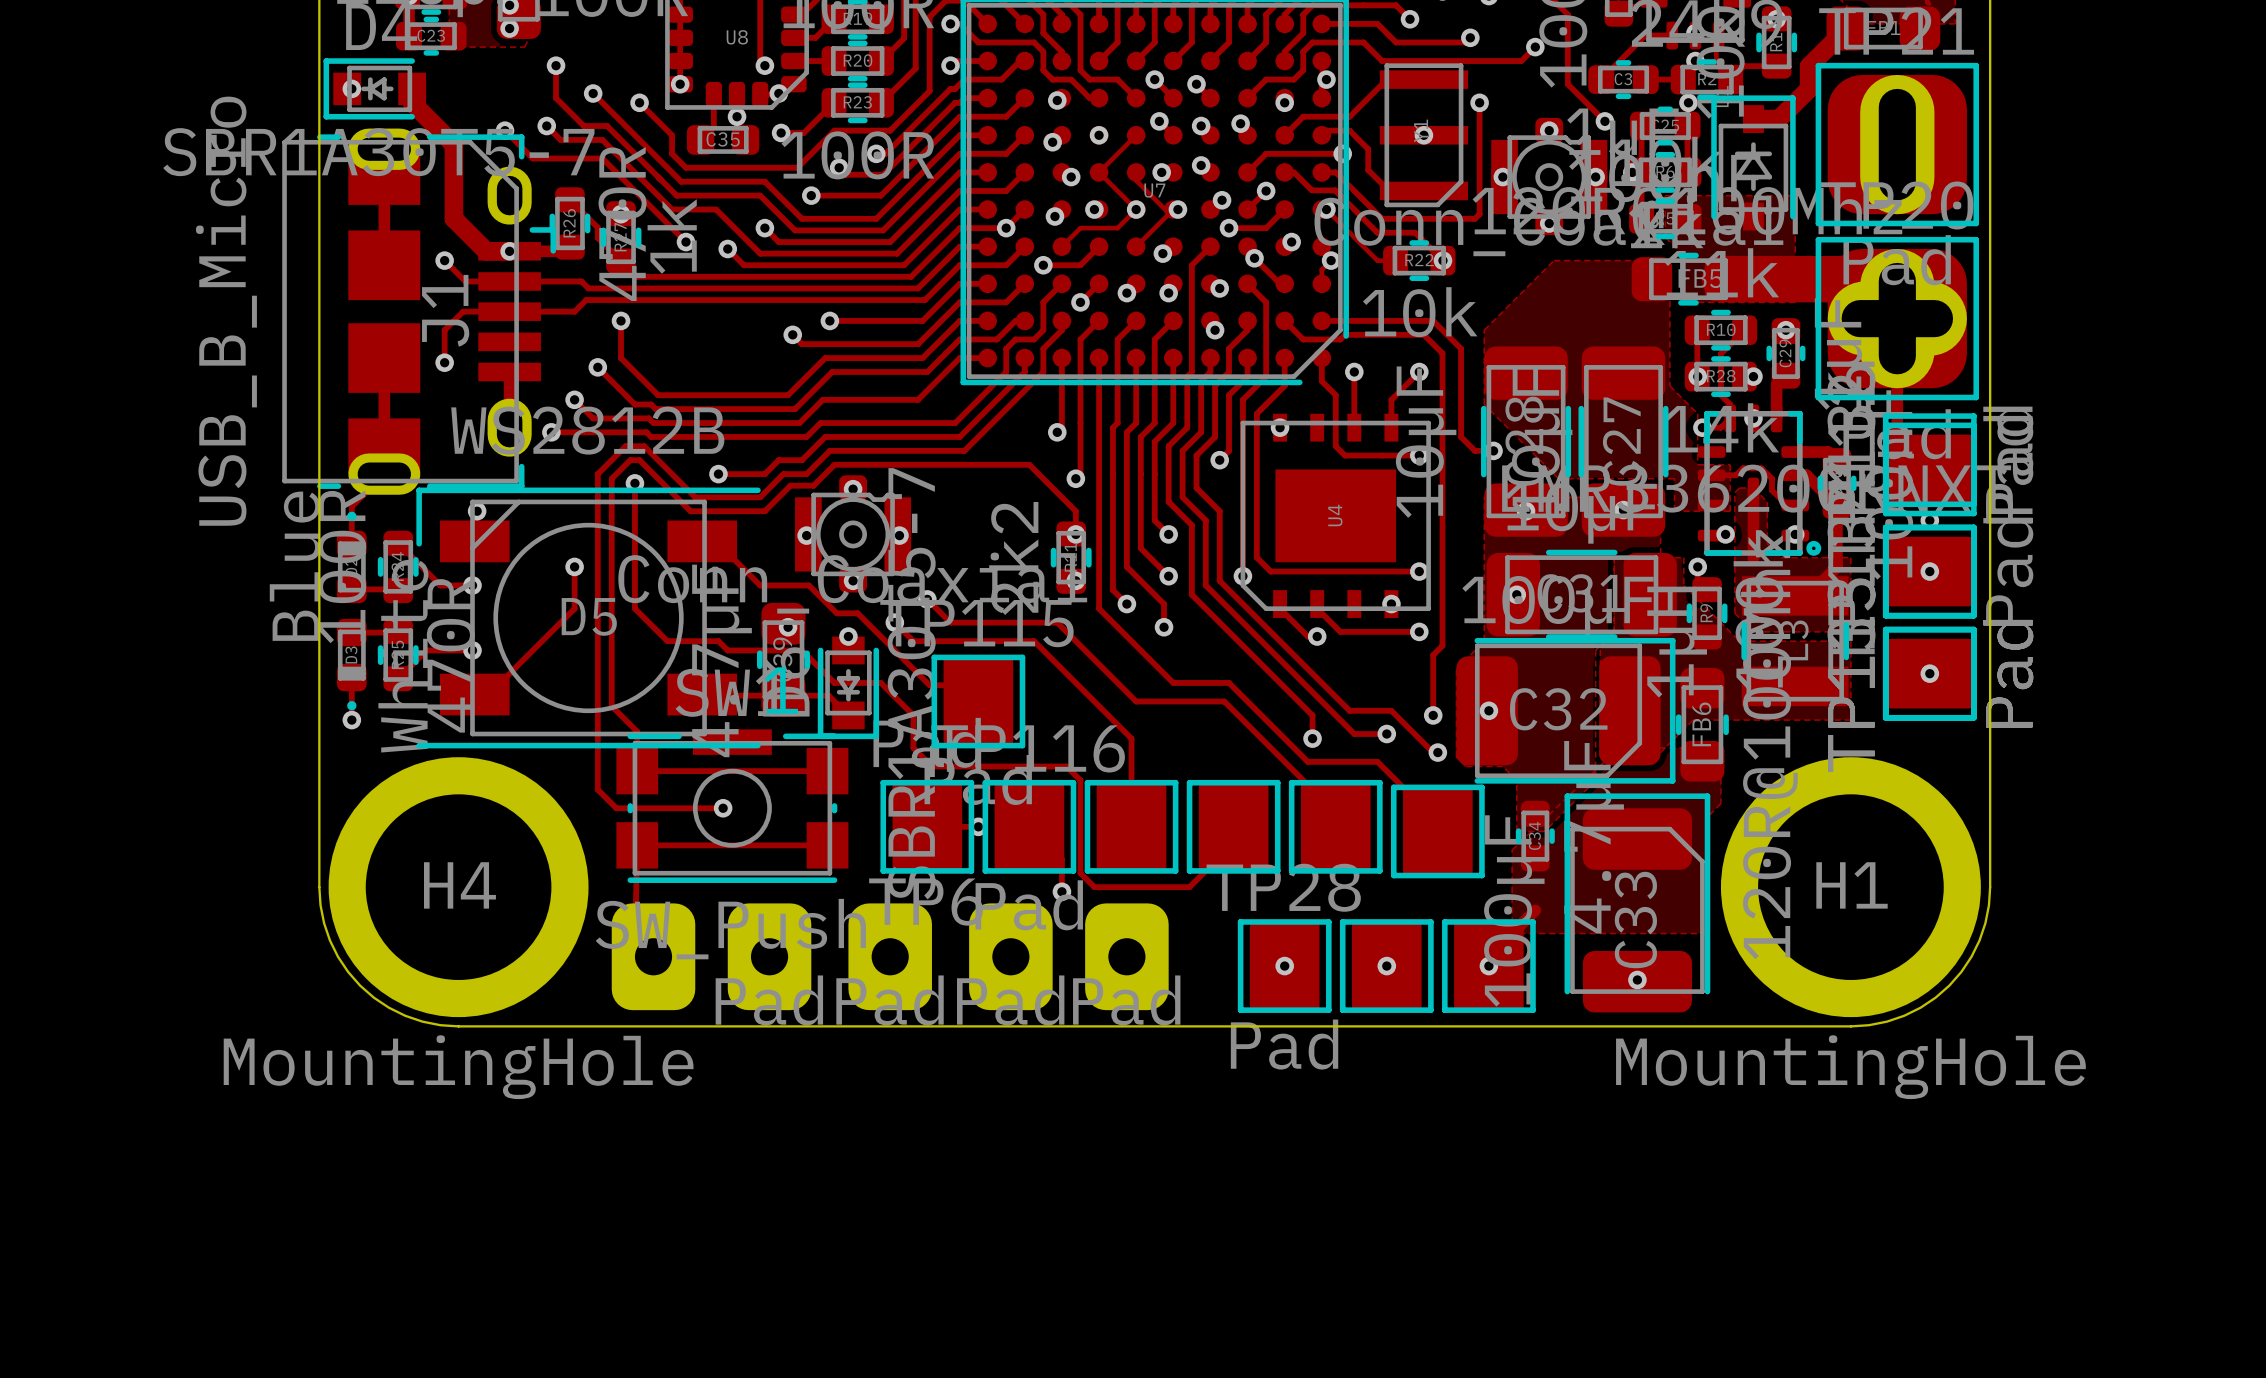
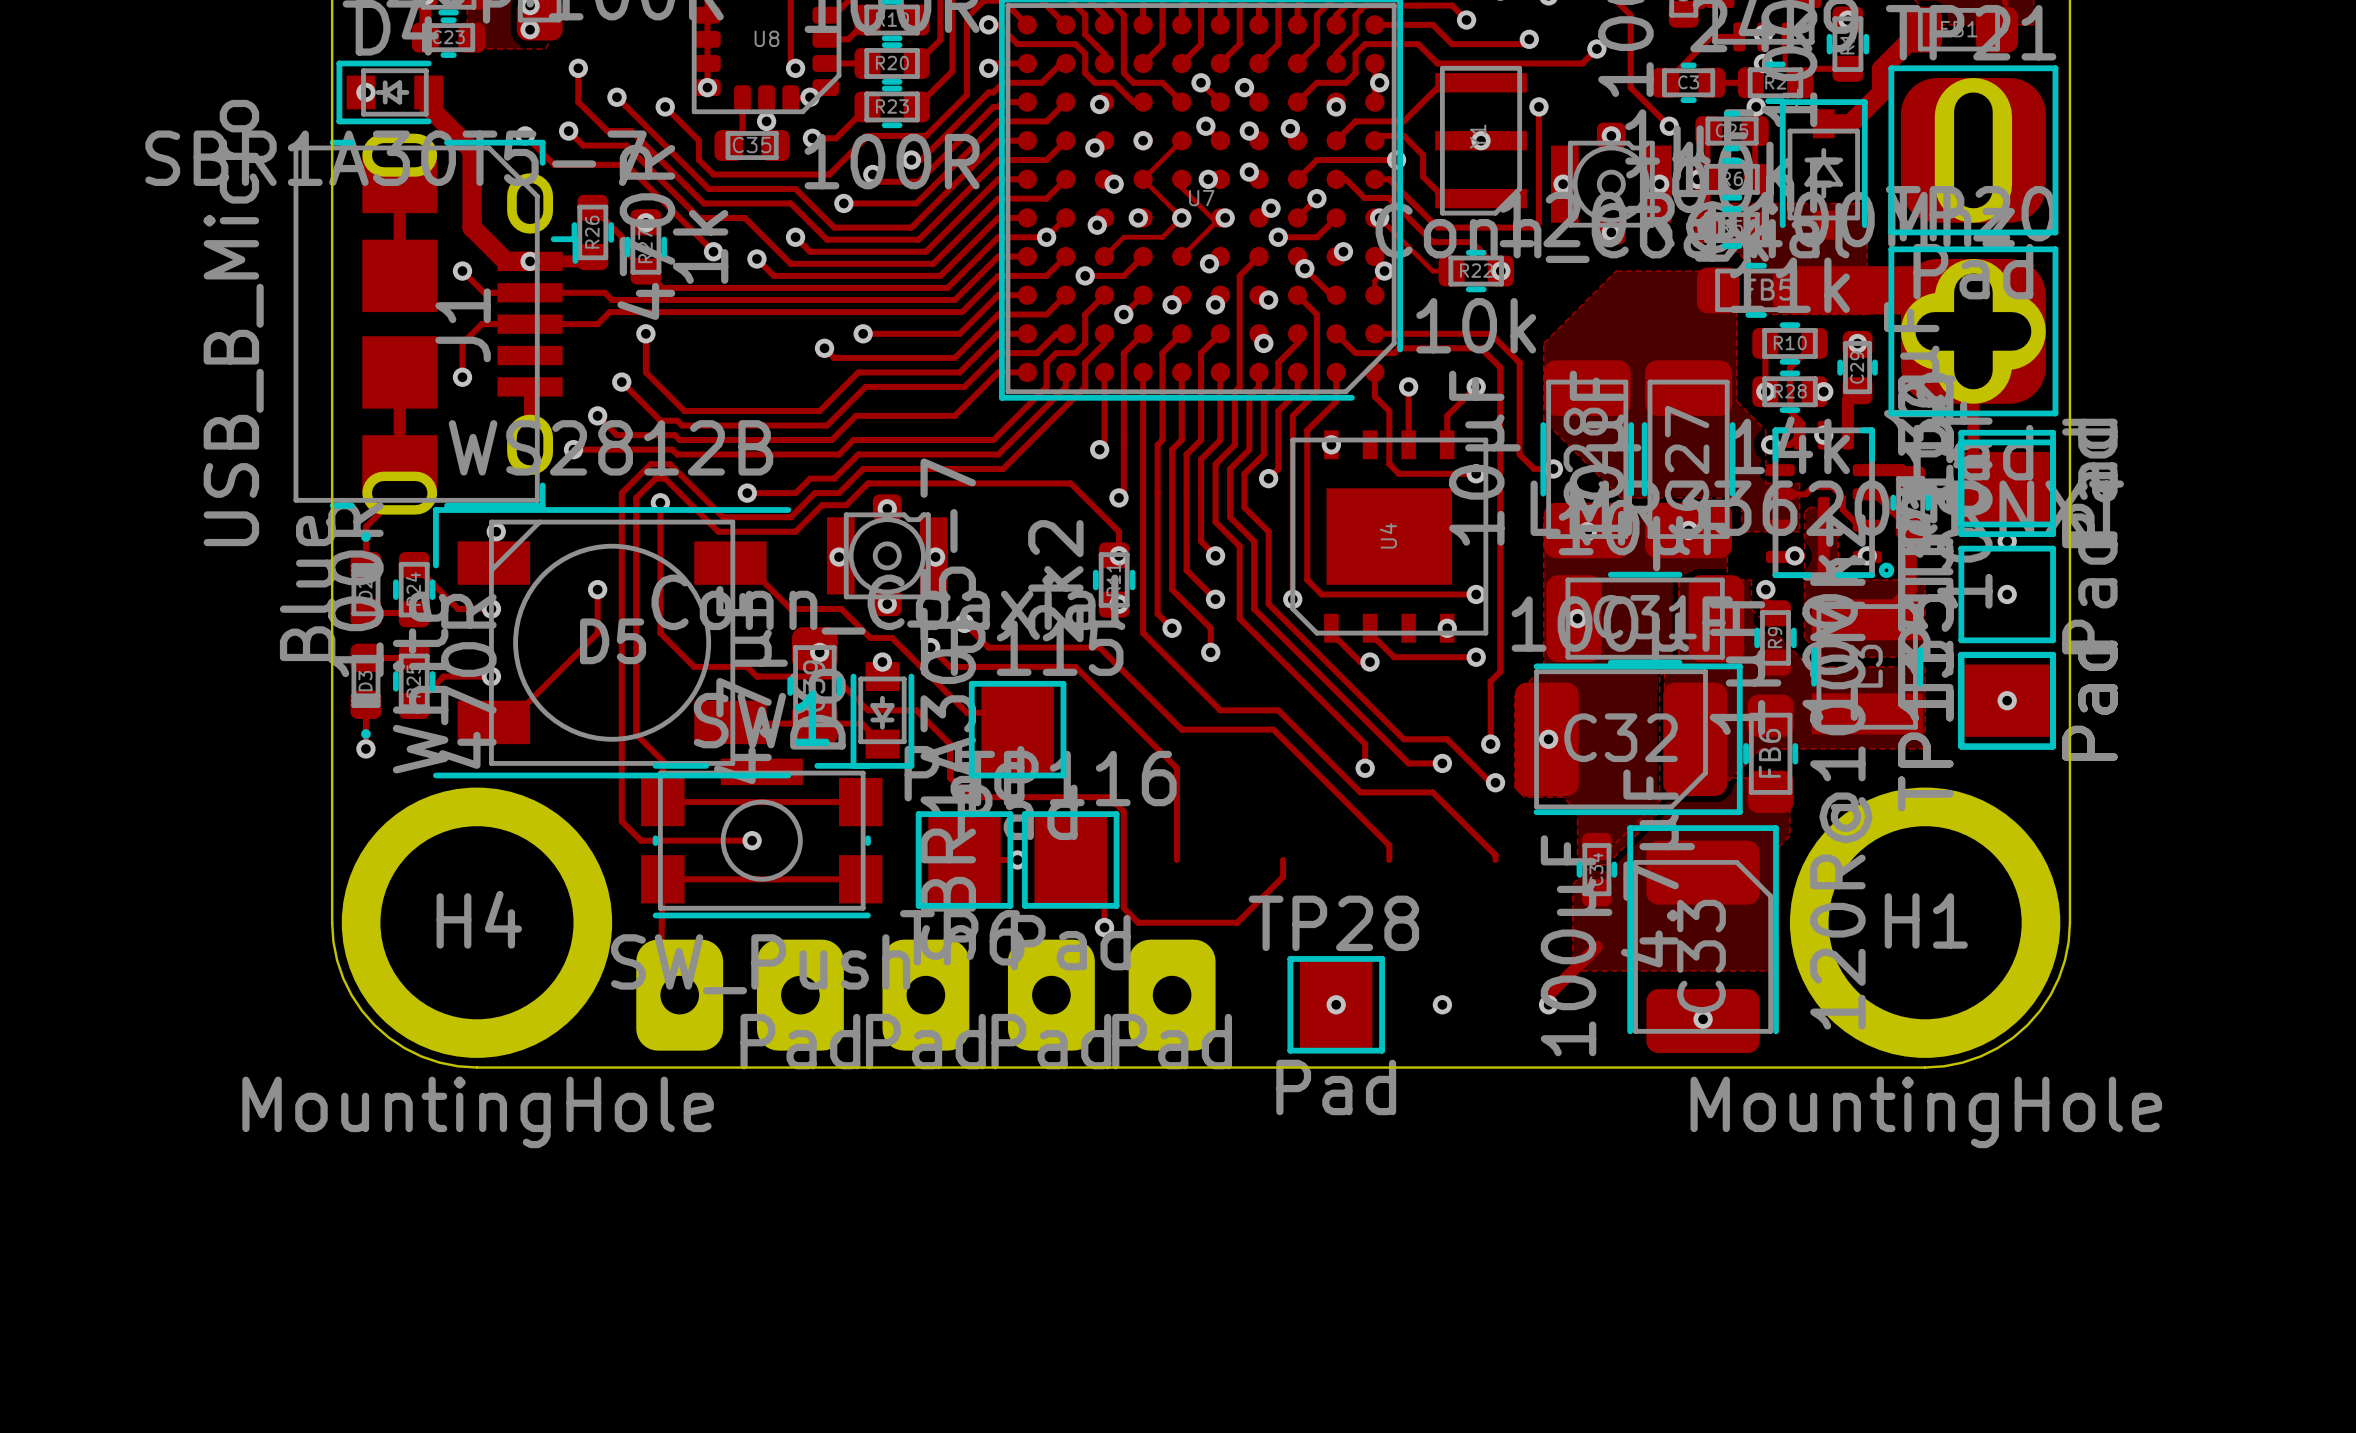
part: (1929, 571) -> none
part: (1131, 826) -> none
part: (1233, 826) -> none
part: (1335, 826) -> none
part: (1437, 831) -> none
part: (1386, 966) -> none
part: (1488, 966) -> none

